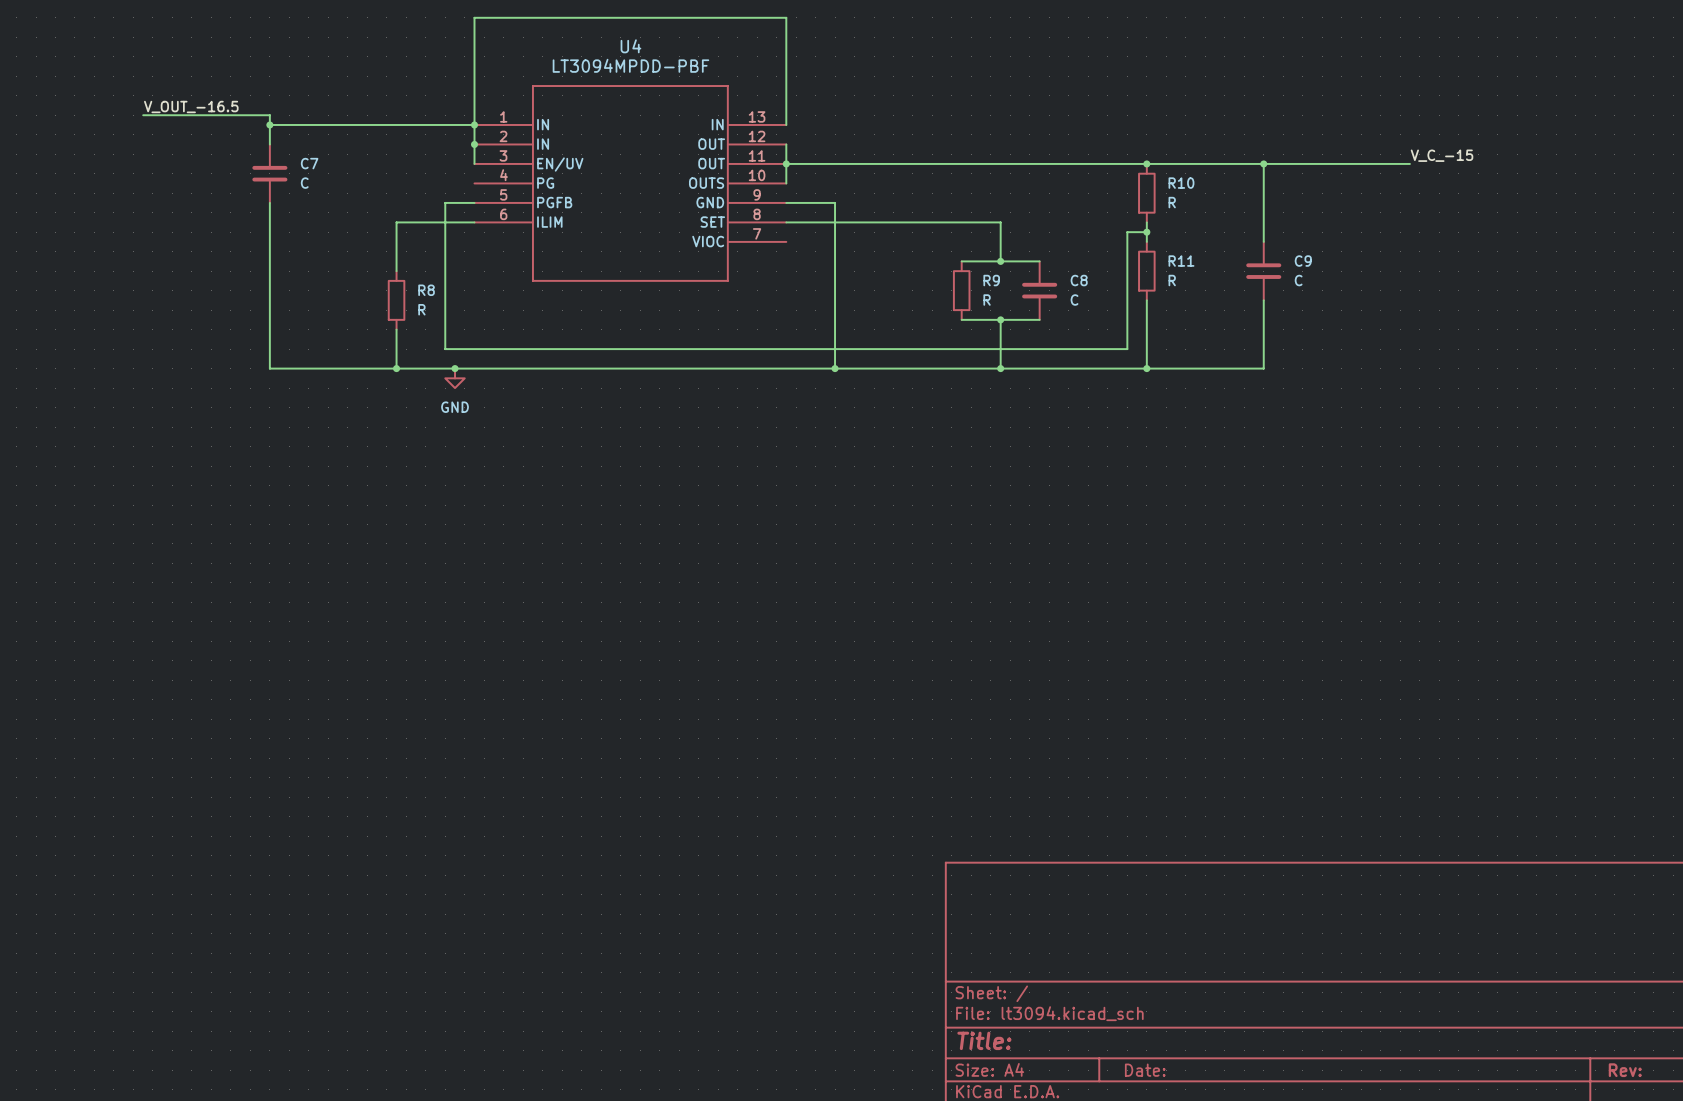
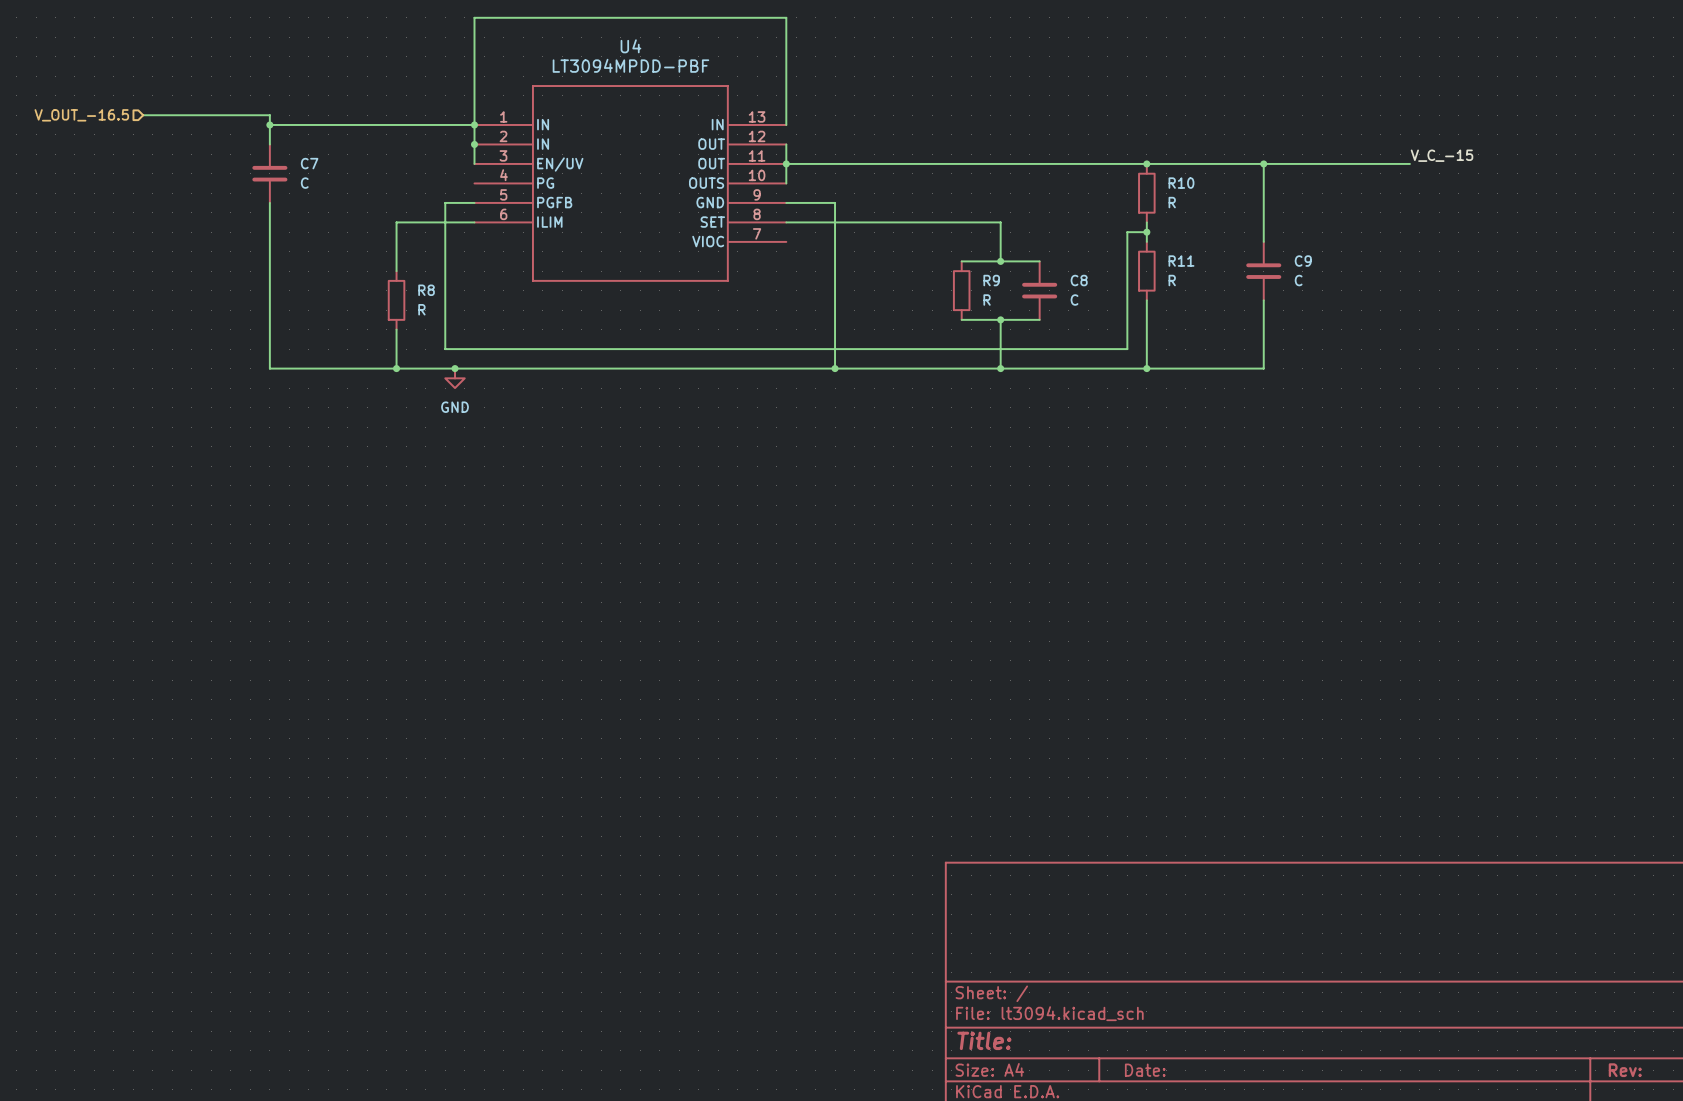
label: V_OUT_-16.5 (191, 107) -> none
hierarchical label: none -> V_OUT_-16.5 (81, 115)

